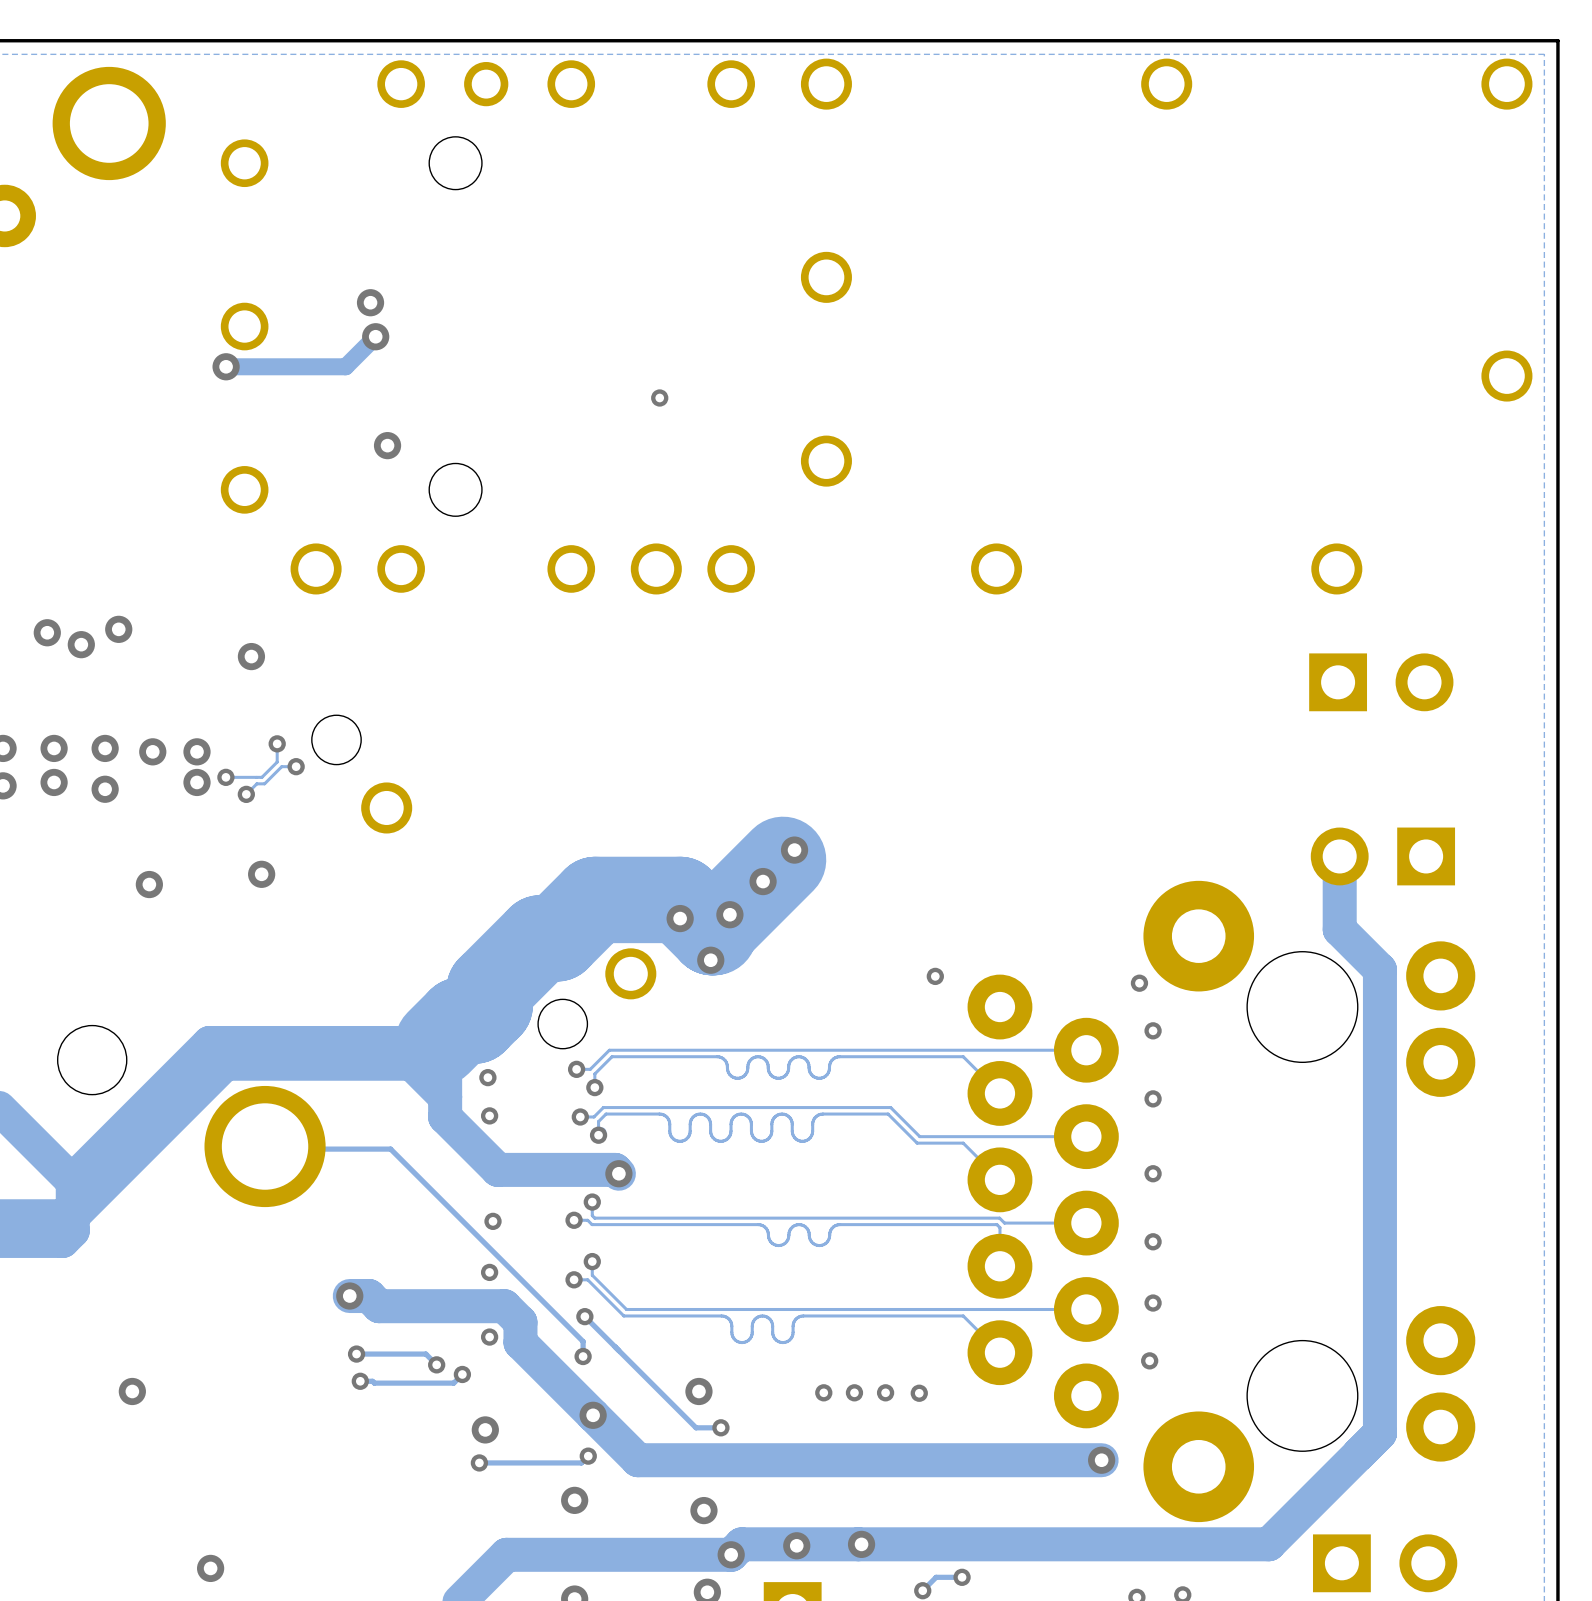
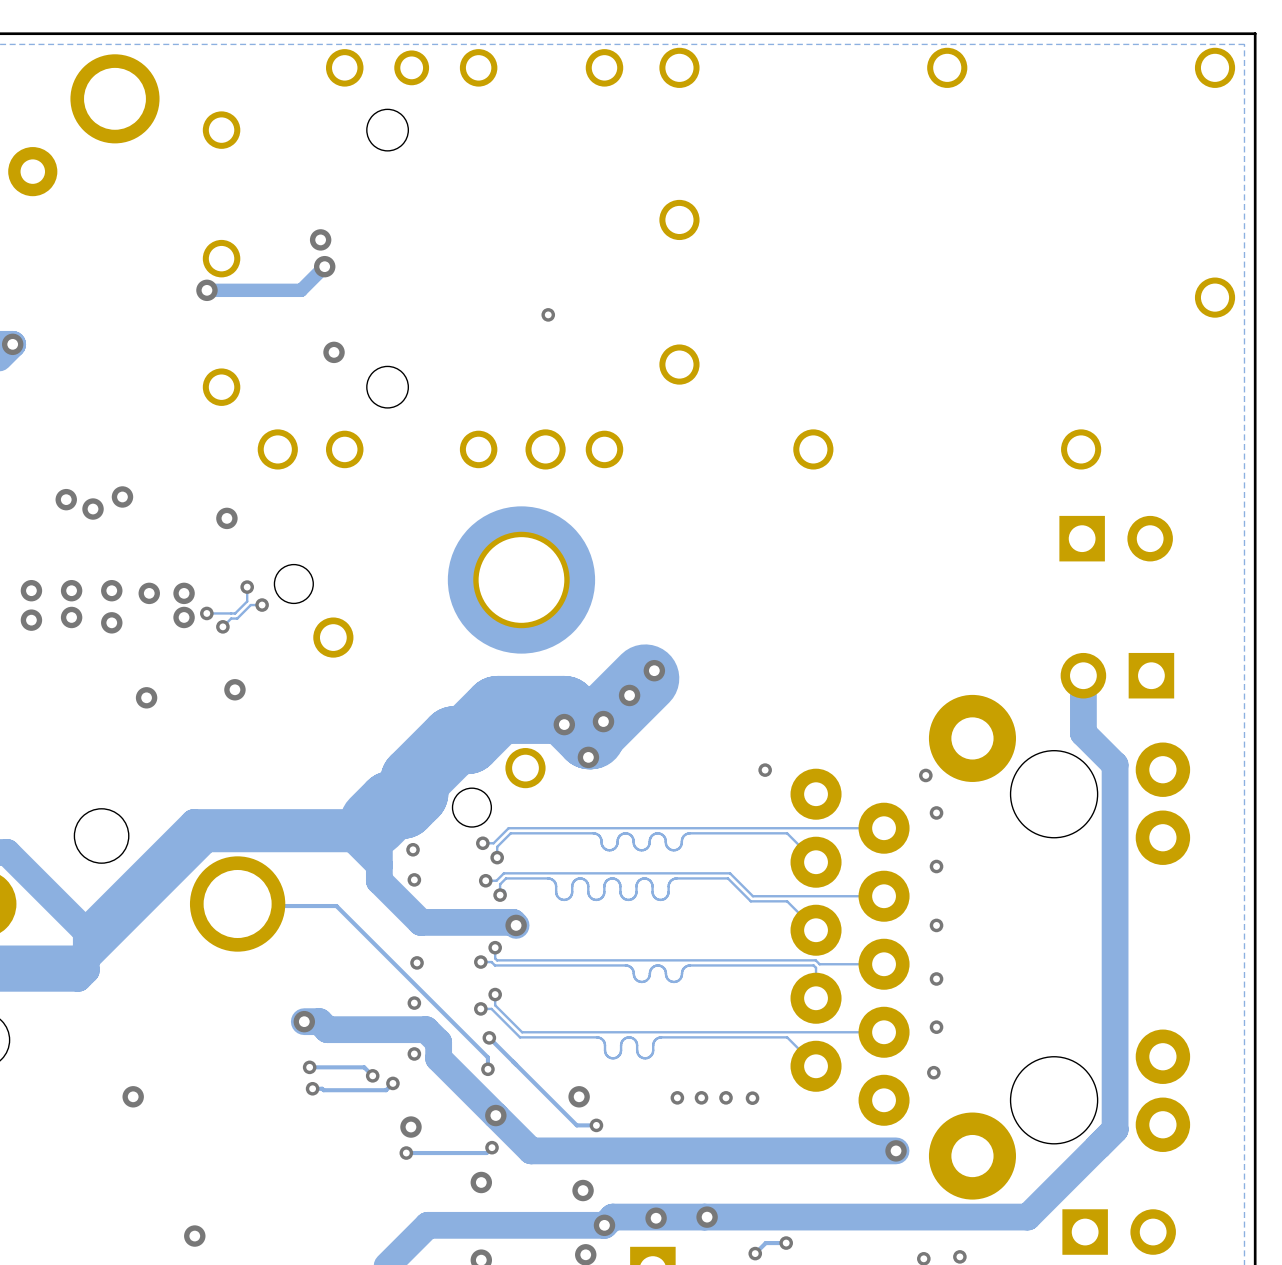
part: none -> (521, 579)

